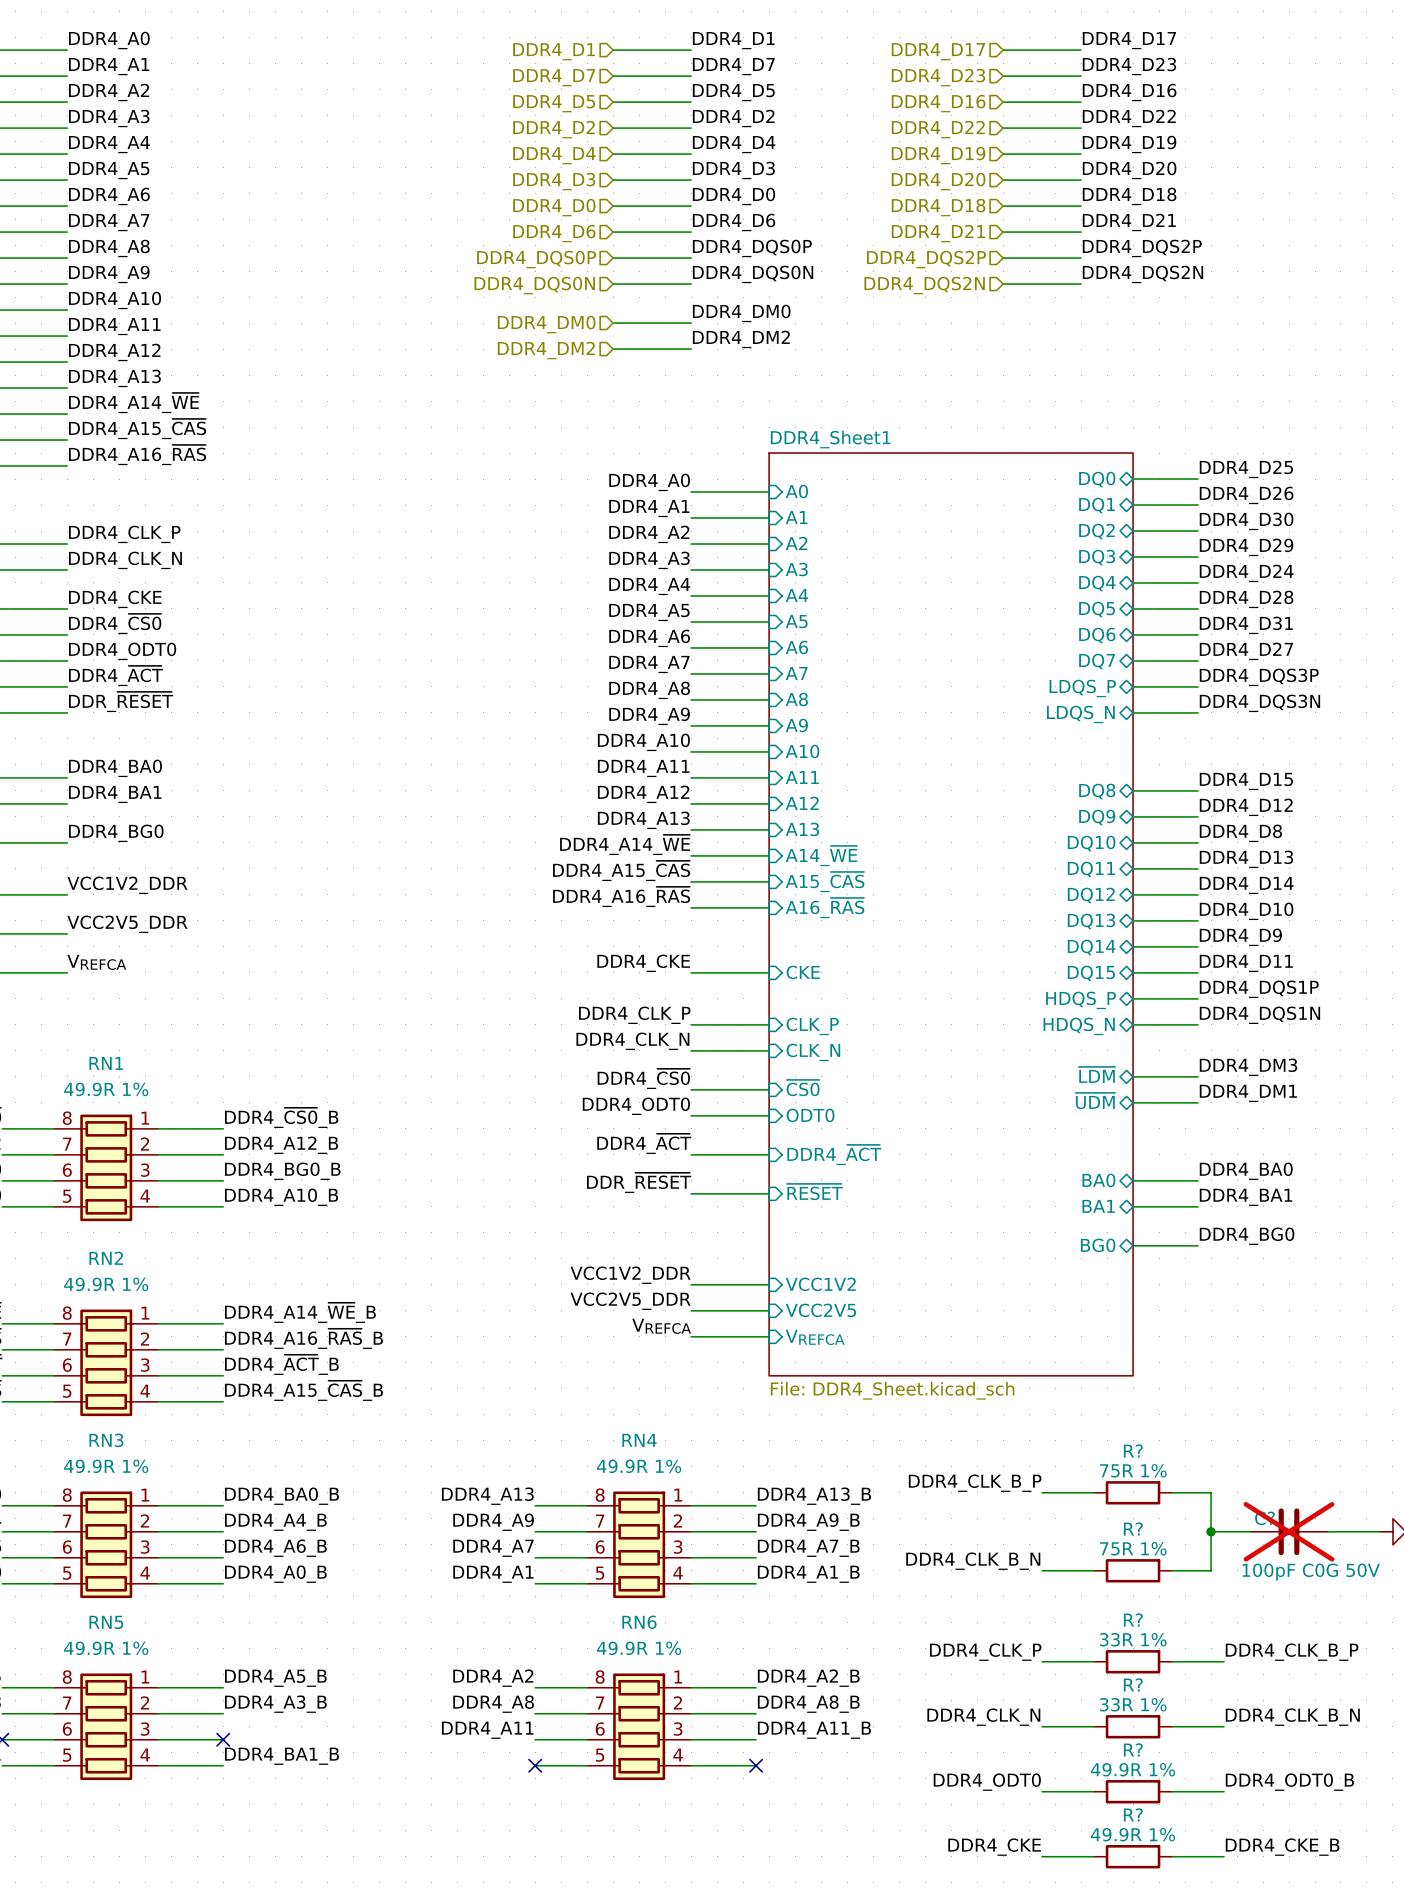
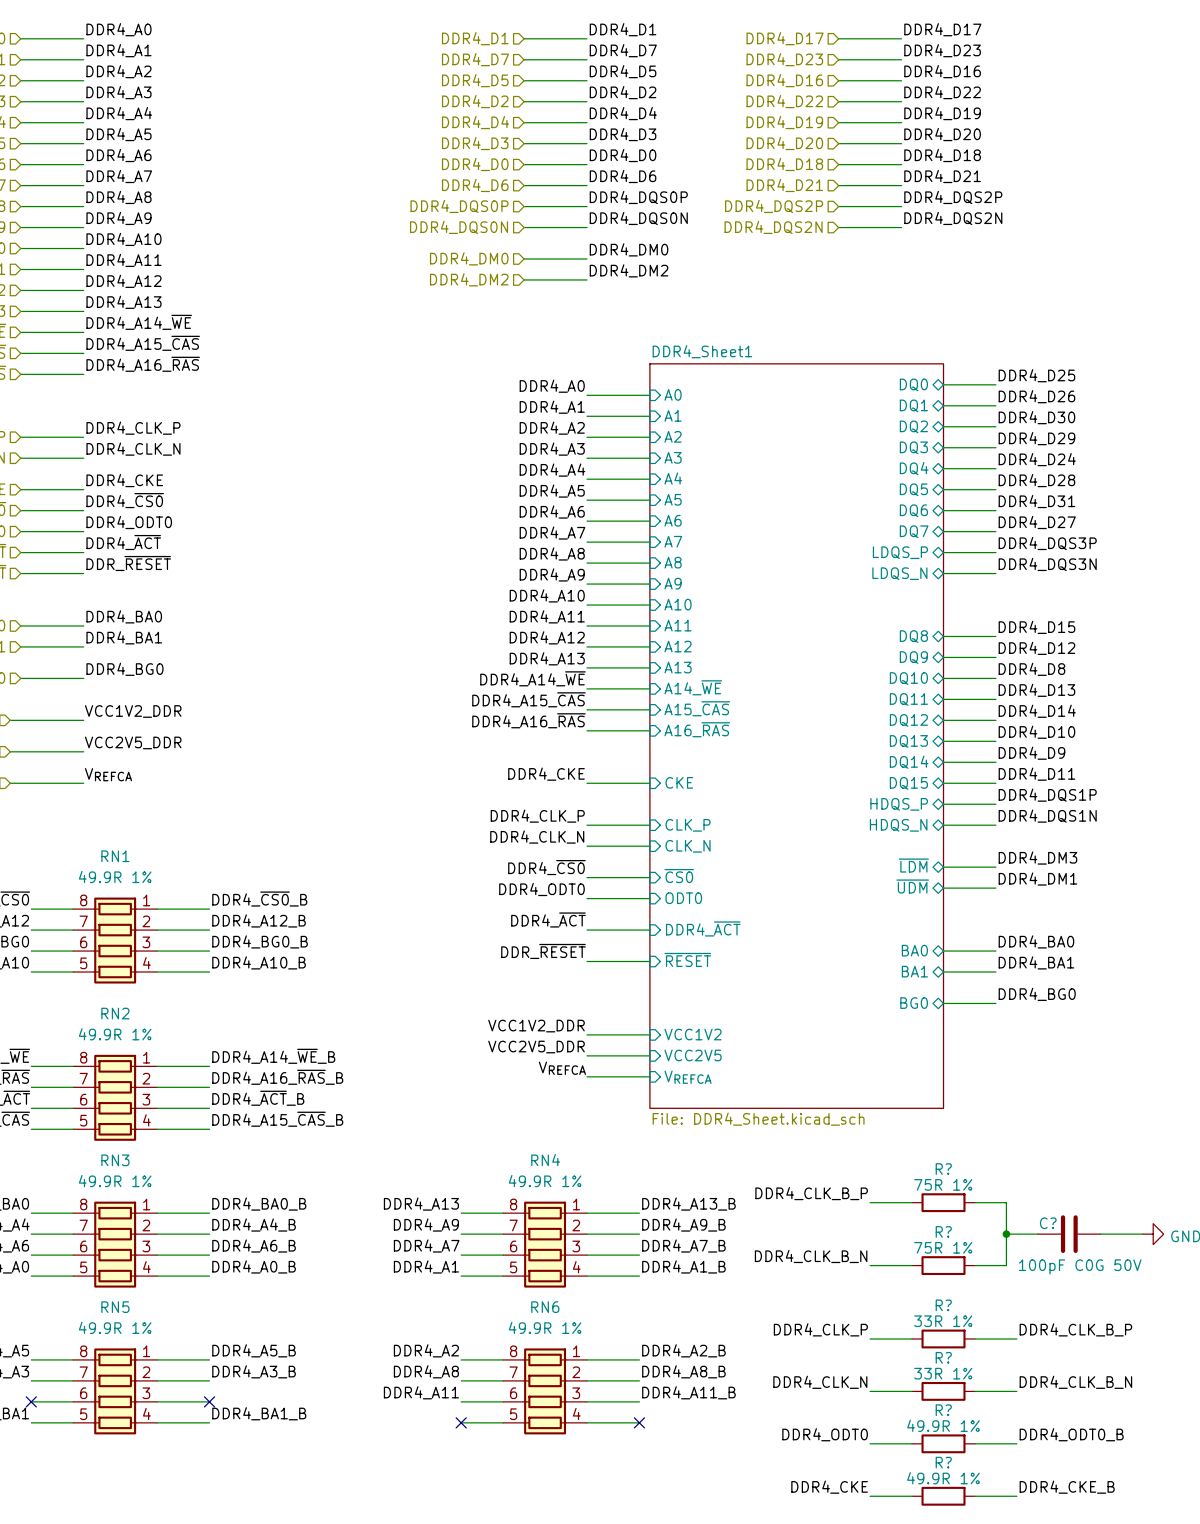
C? do-not-place cross: (1289, 1531) -> none

